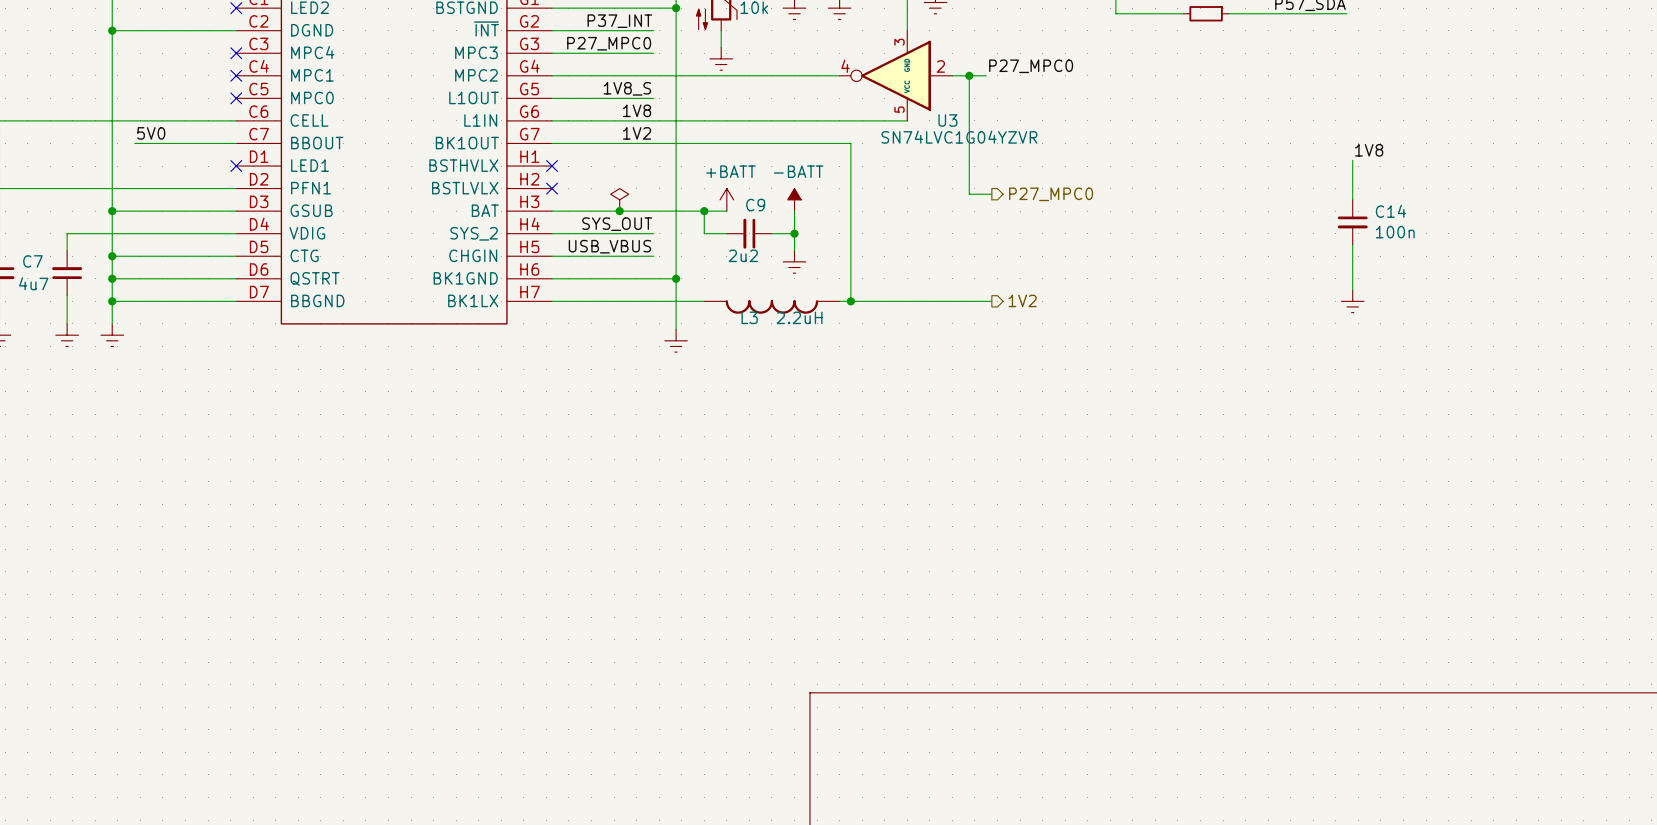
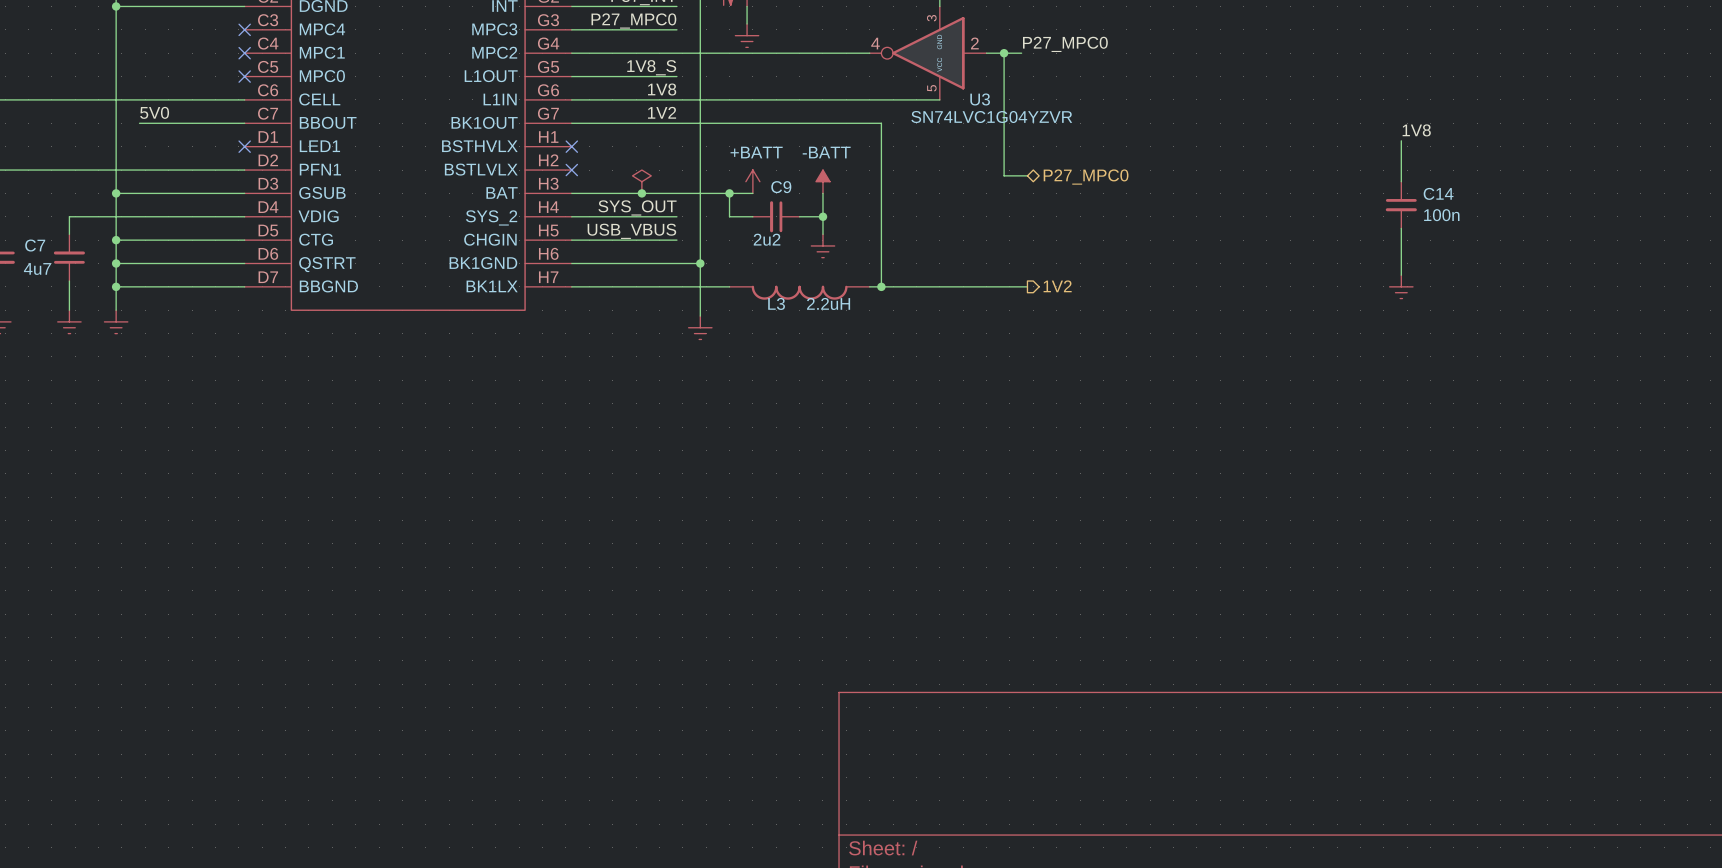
hierarchical label shape: output (1051, 194) -> bidirectional (1086, 177)

